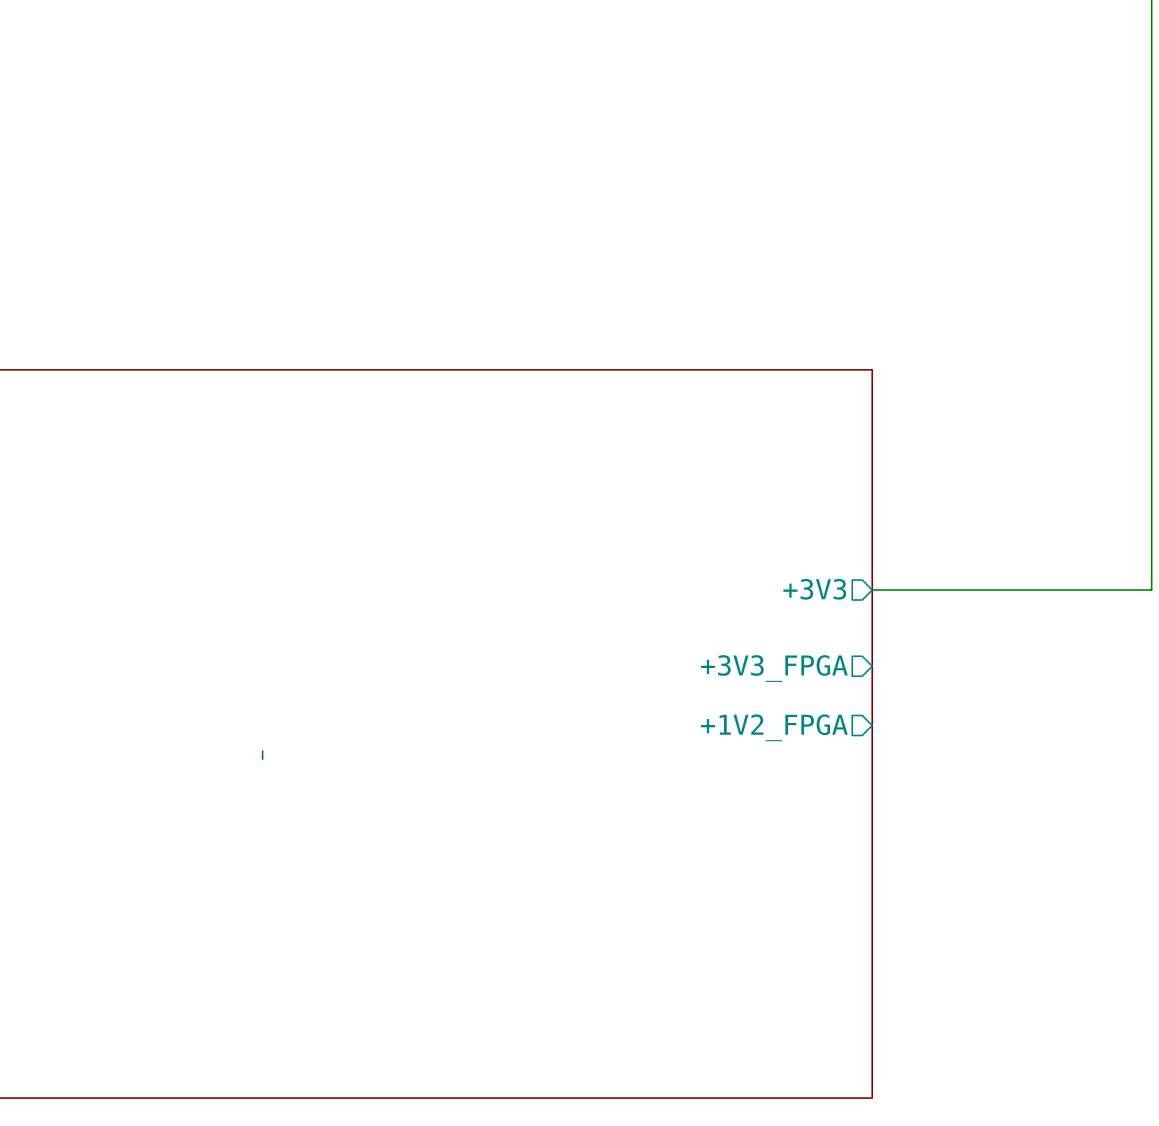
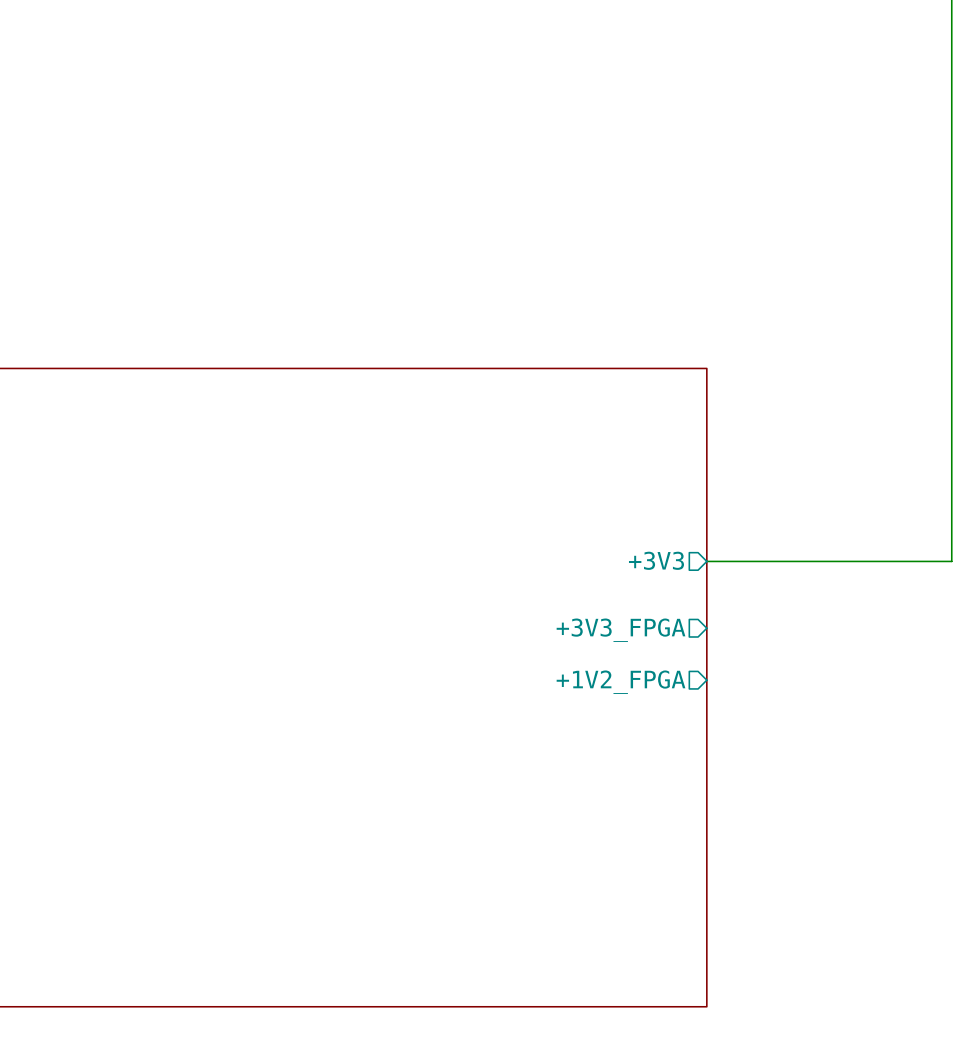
wire: (262, 750) (262, 759) -> none

